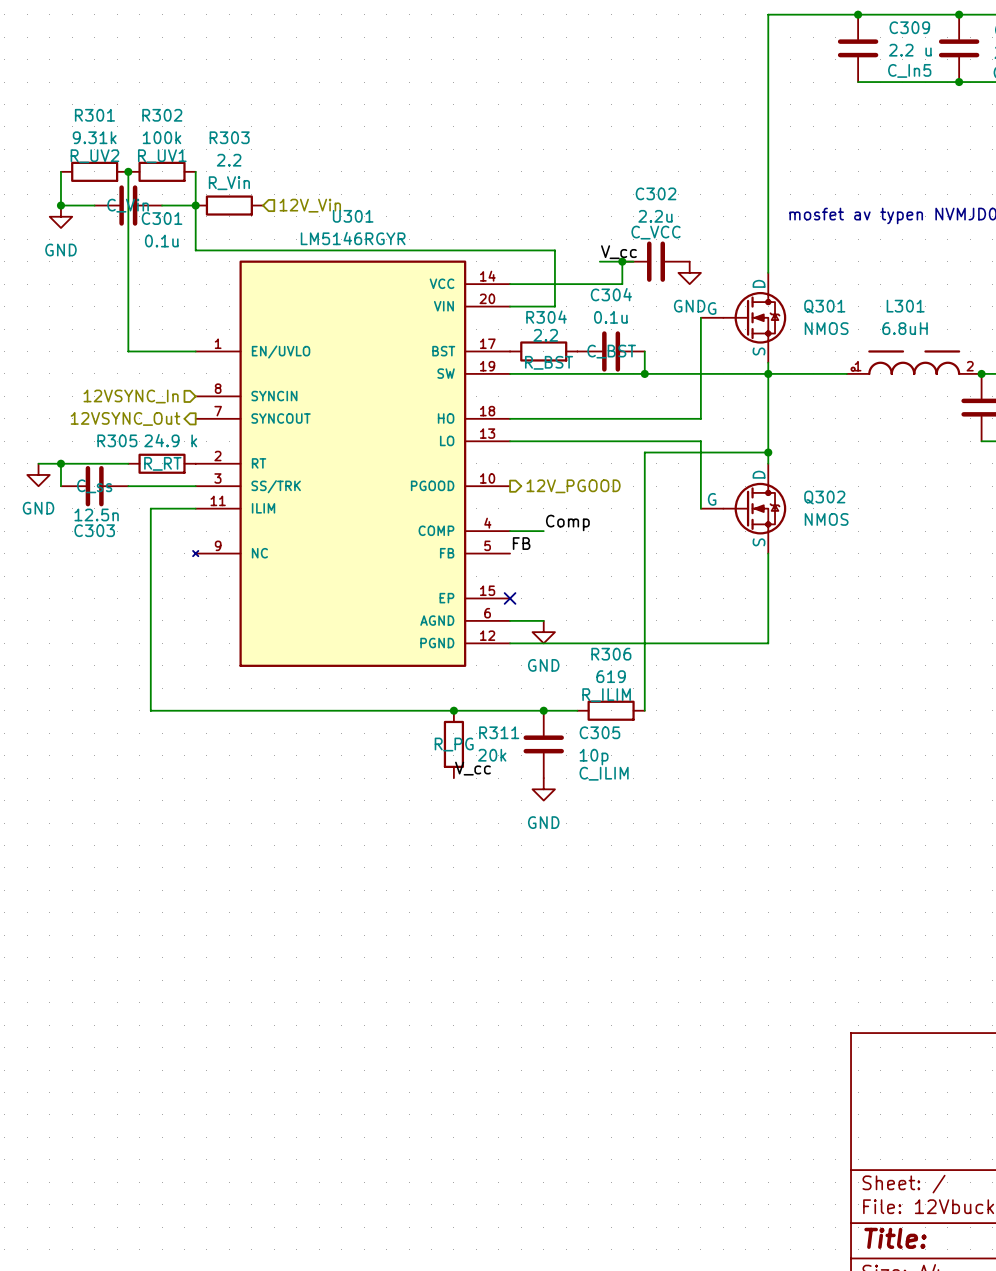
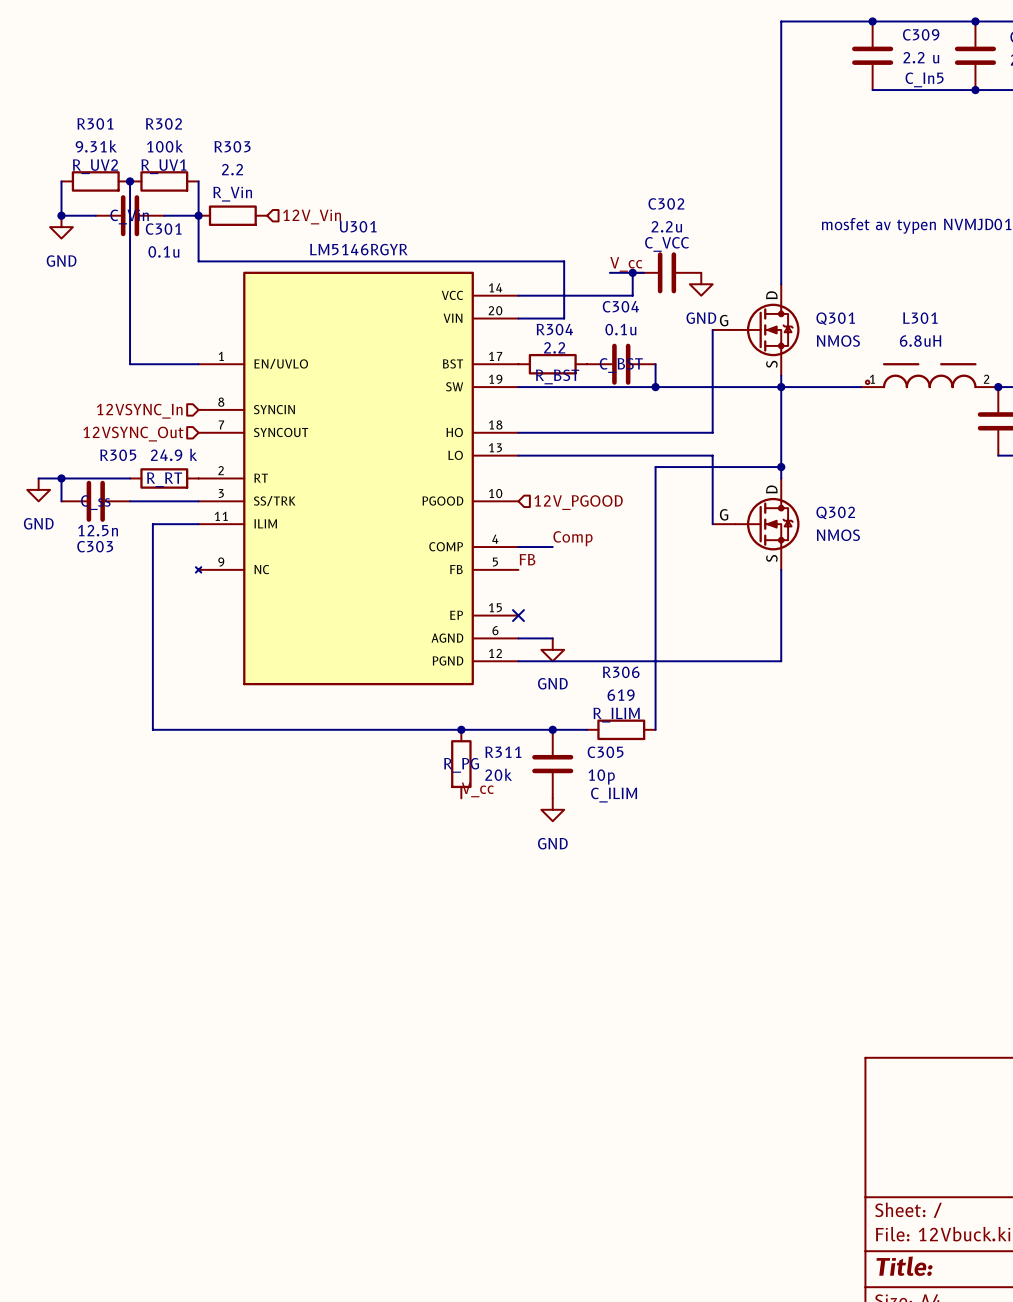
hierarchical label shape: output (125, 418) -> input (133, 434)
hierarchical label shape: output (573, 486) -> input (578, 502)

